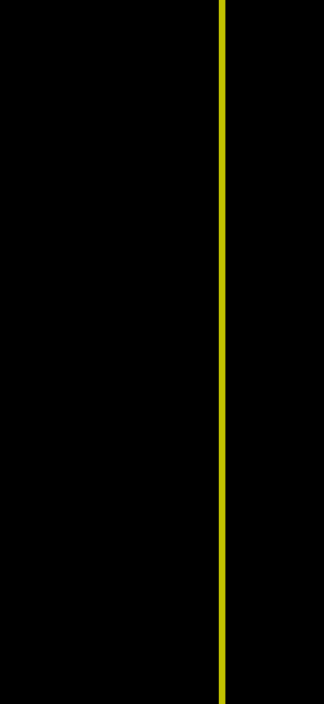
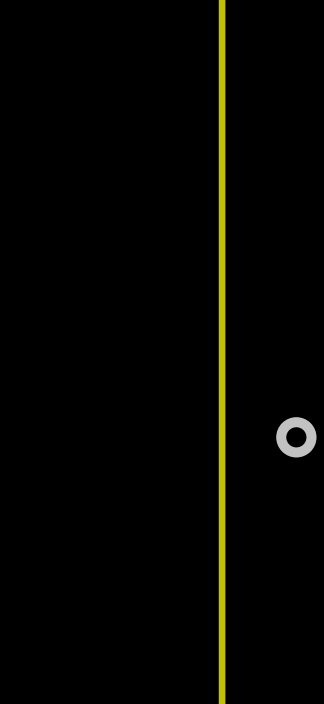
via: none -> (296, 437)

